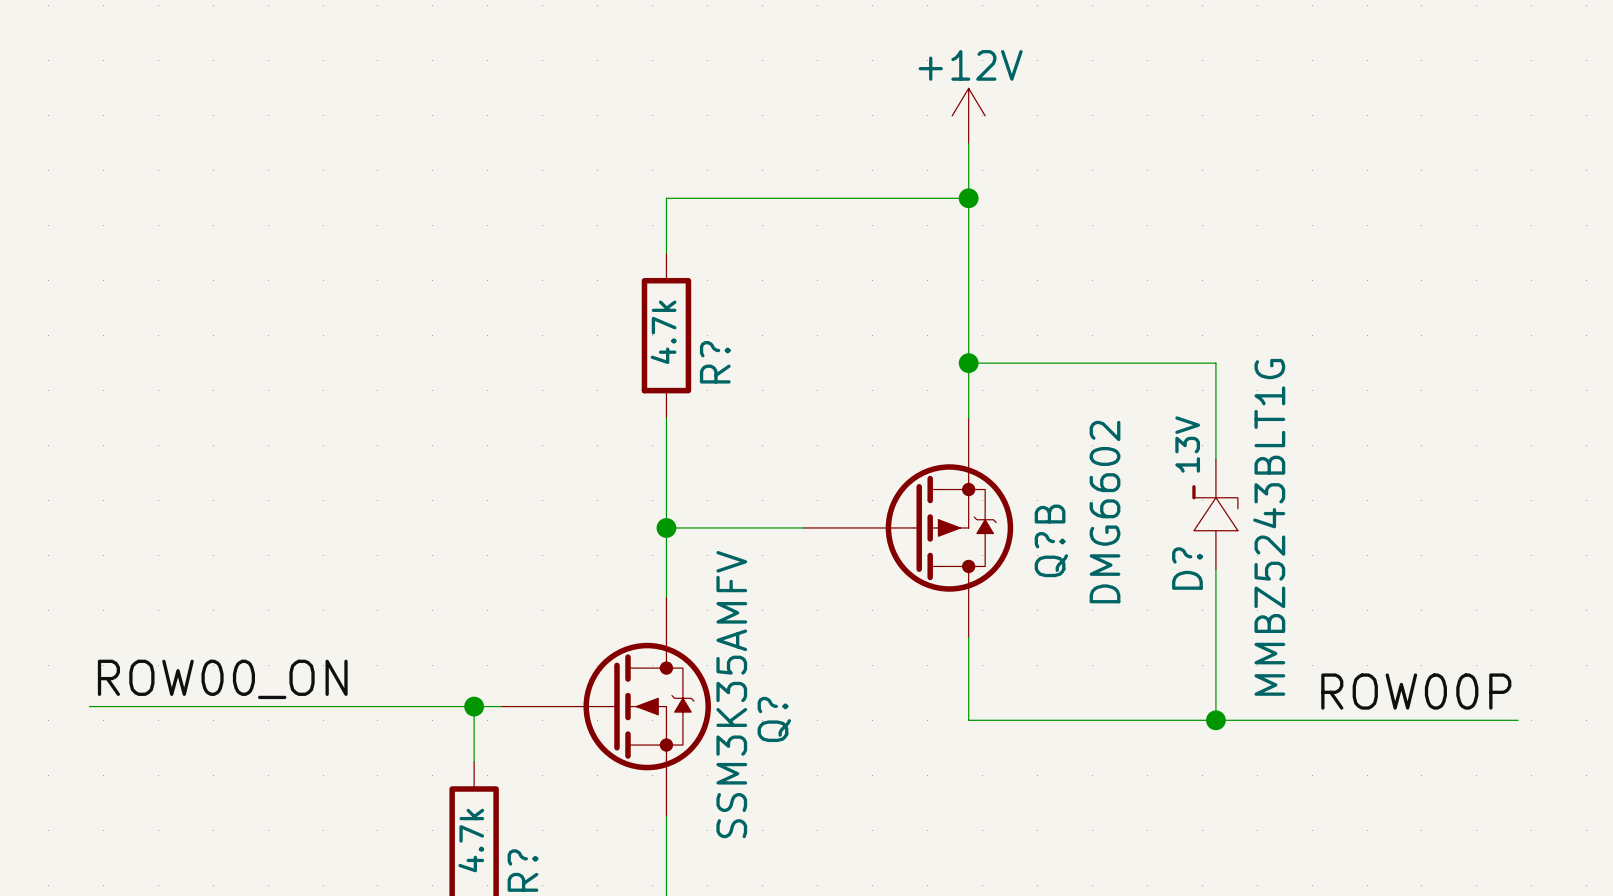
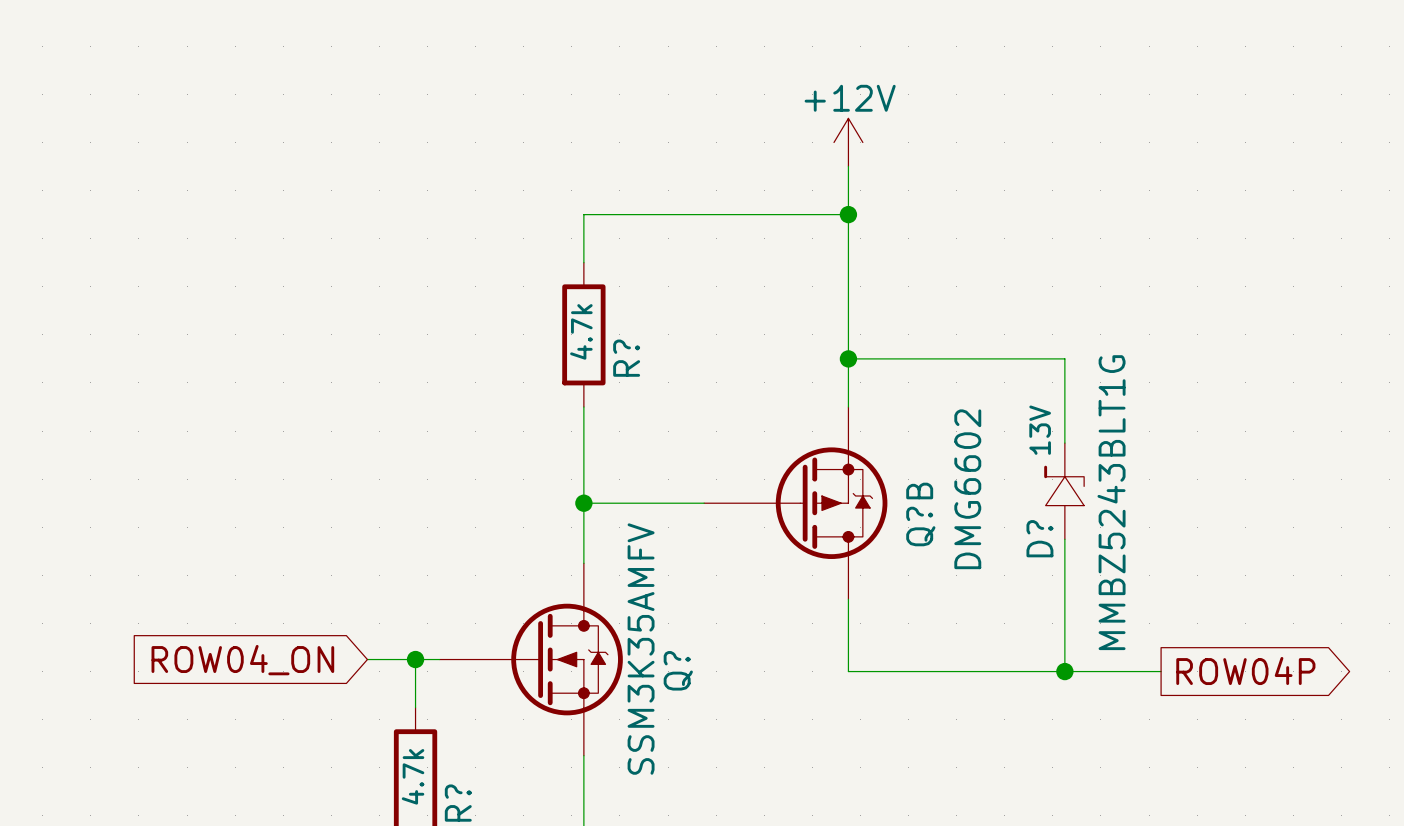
label: ROW00_ON (222, 679) -> none
label: ROW00P (1416, 691) -> none
wire: (89, 706) (419, 706) -> none
global label: none -> ROW04_ON (242, 660)
global label: none -> ROW04P (1245, 670)
wire: (1325, 720) (1518, 720) -> none

